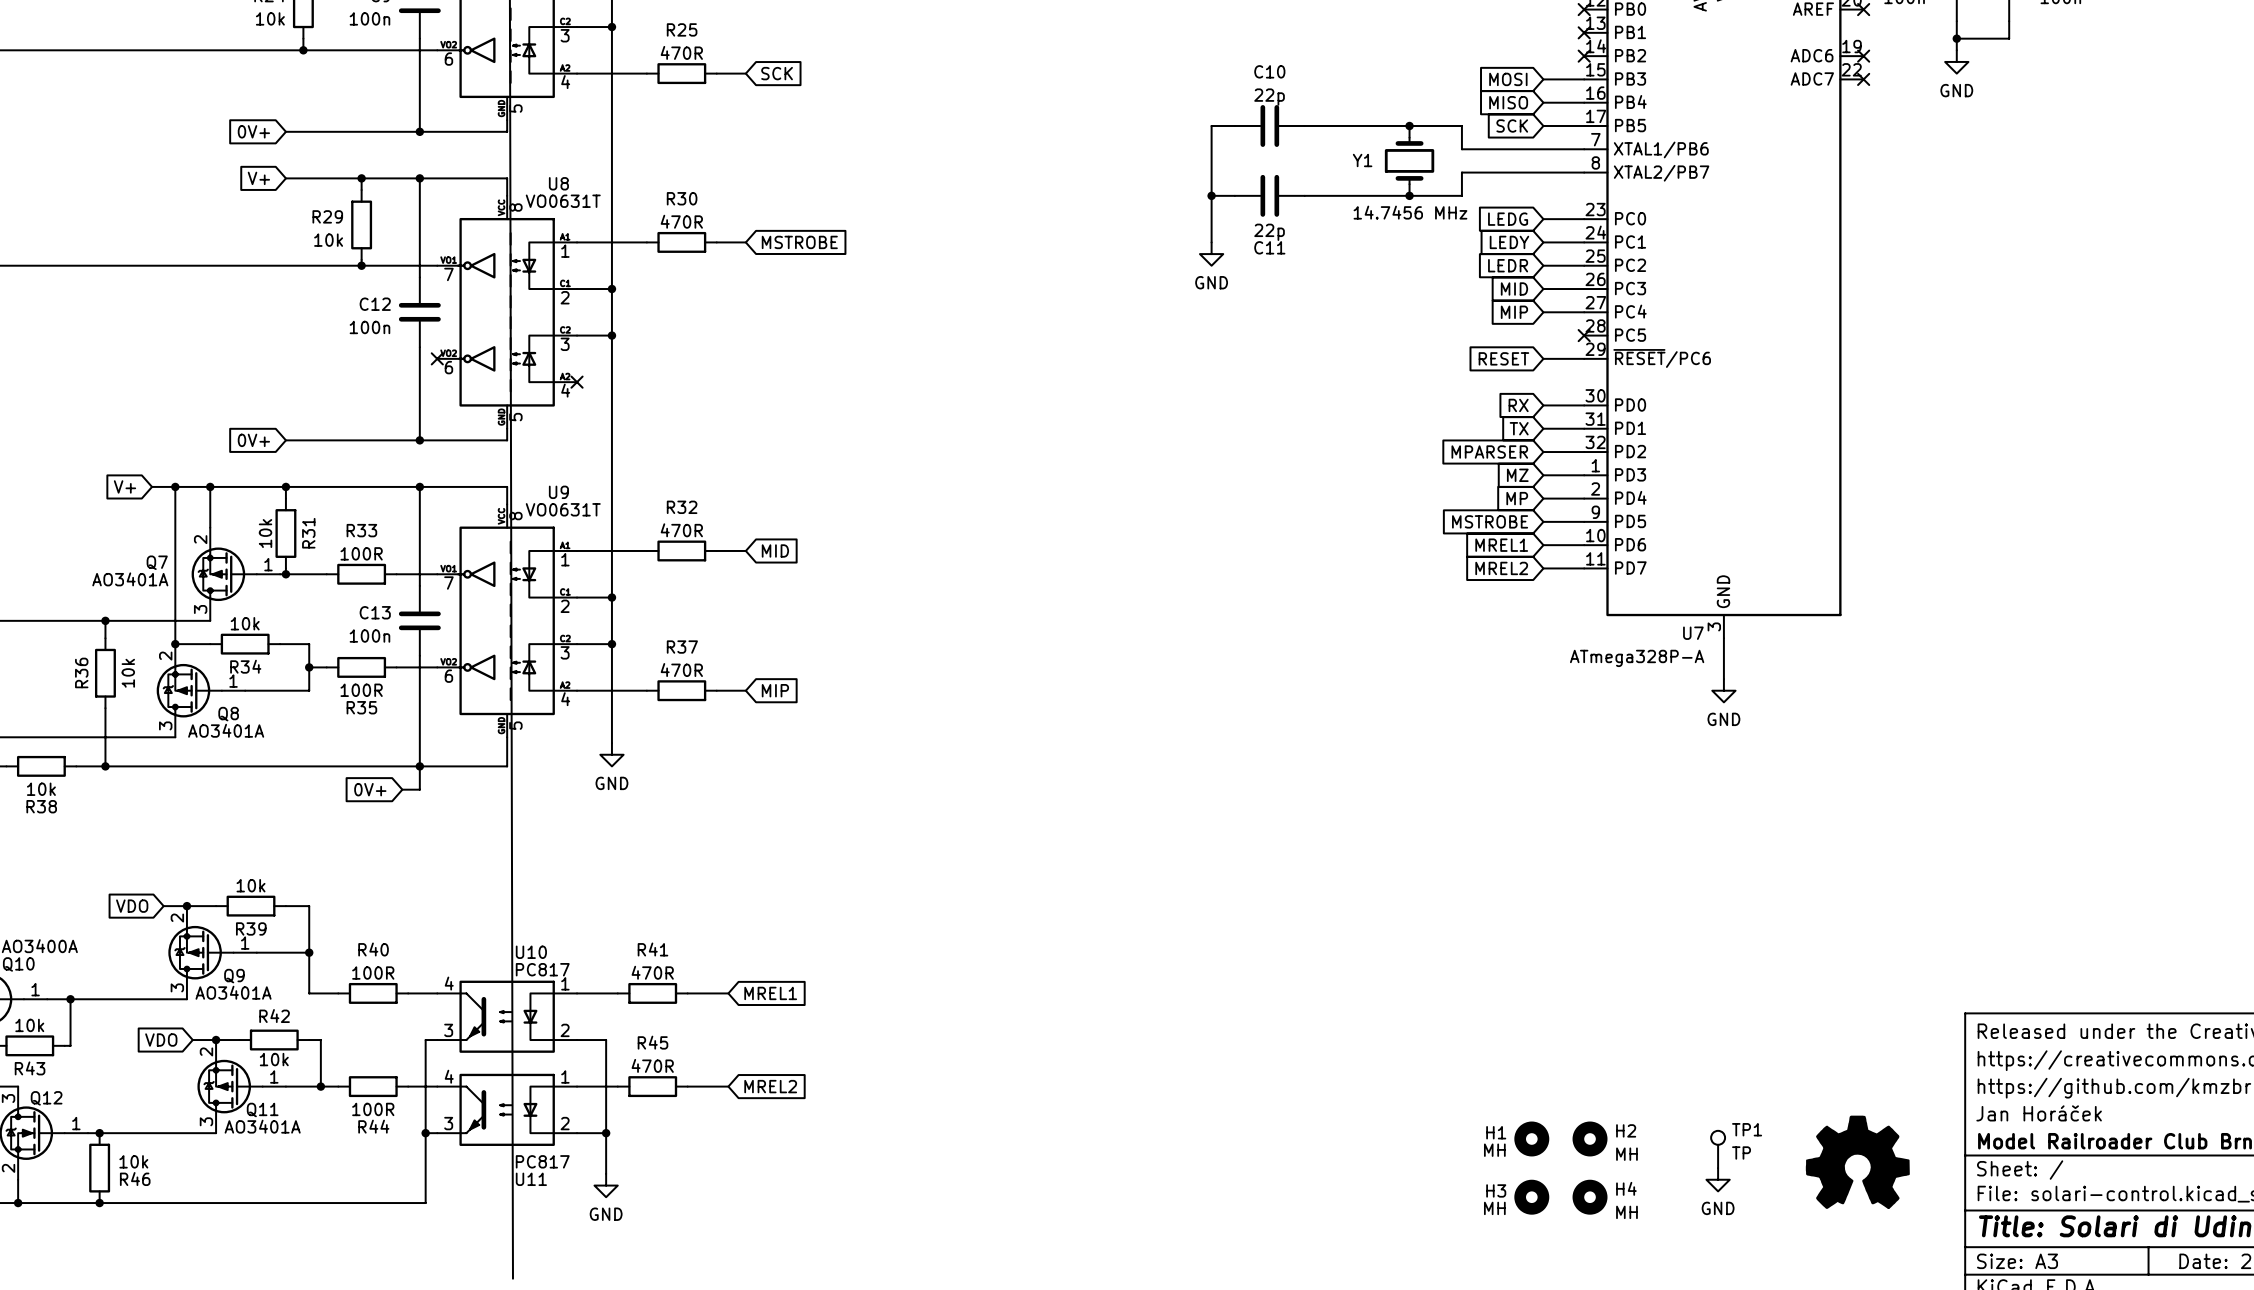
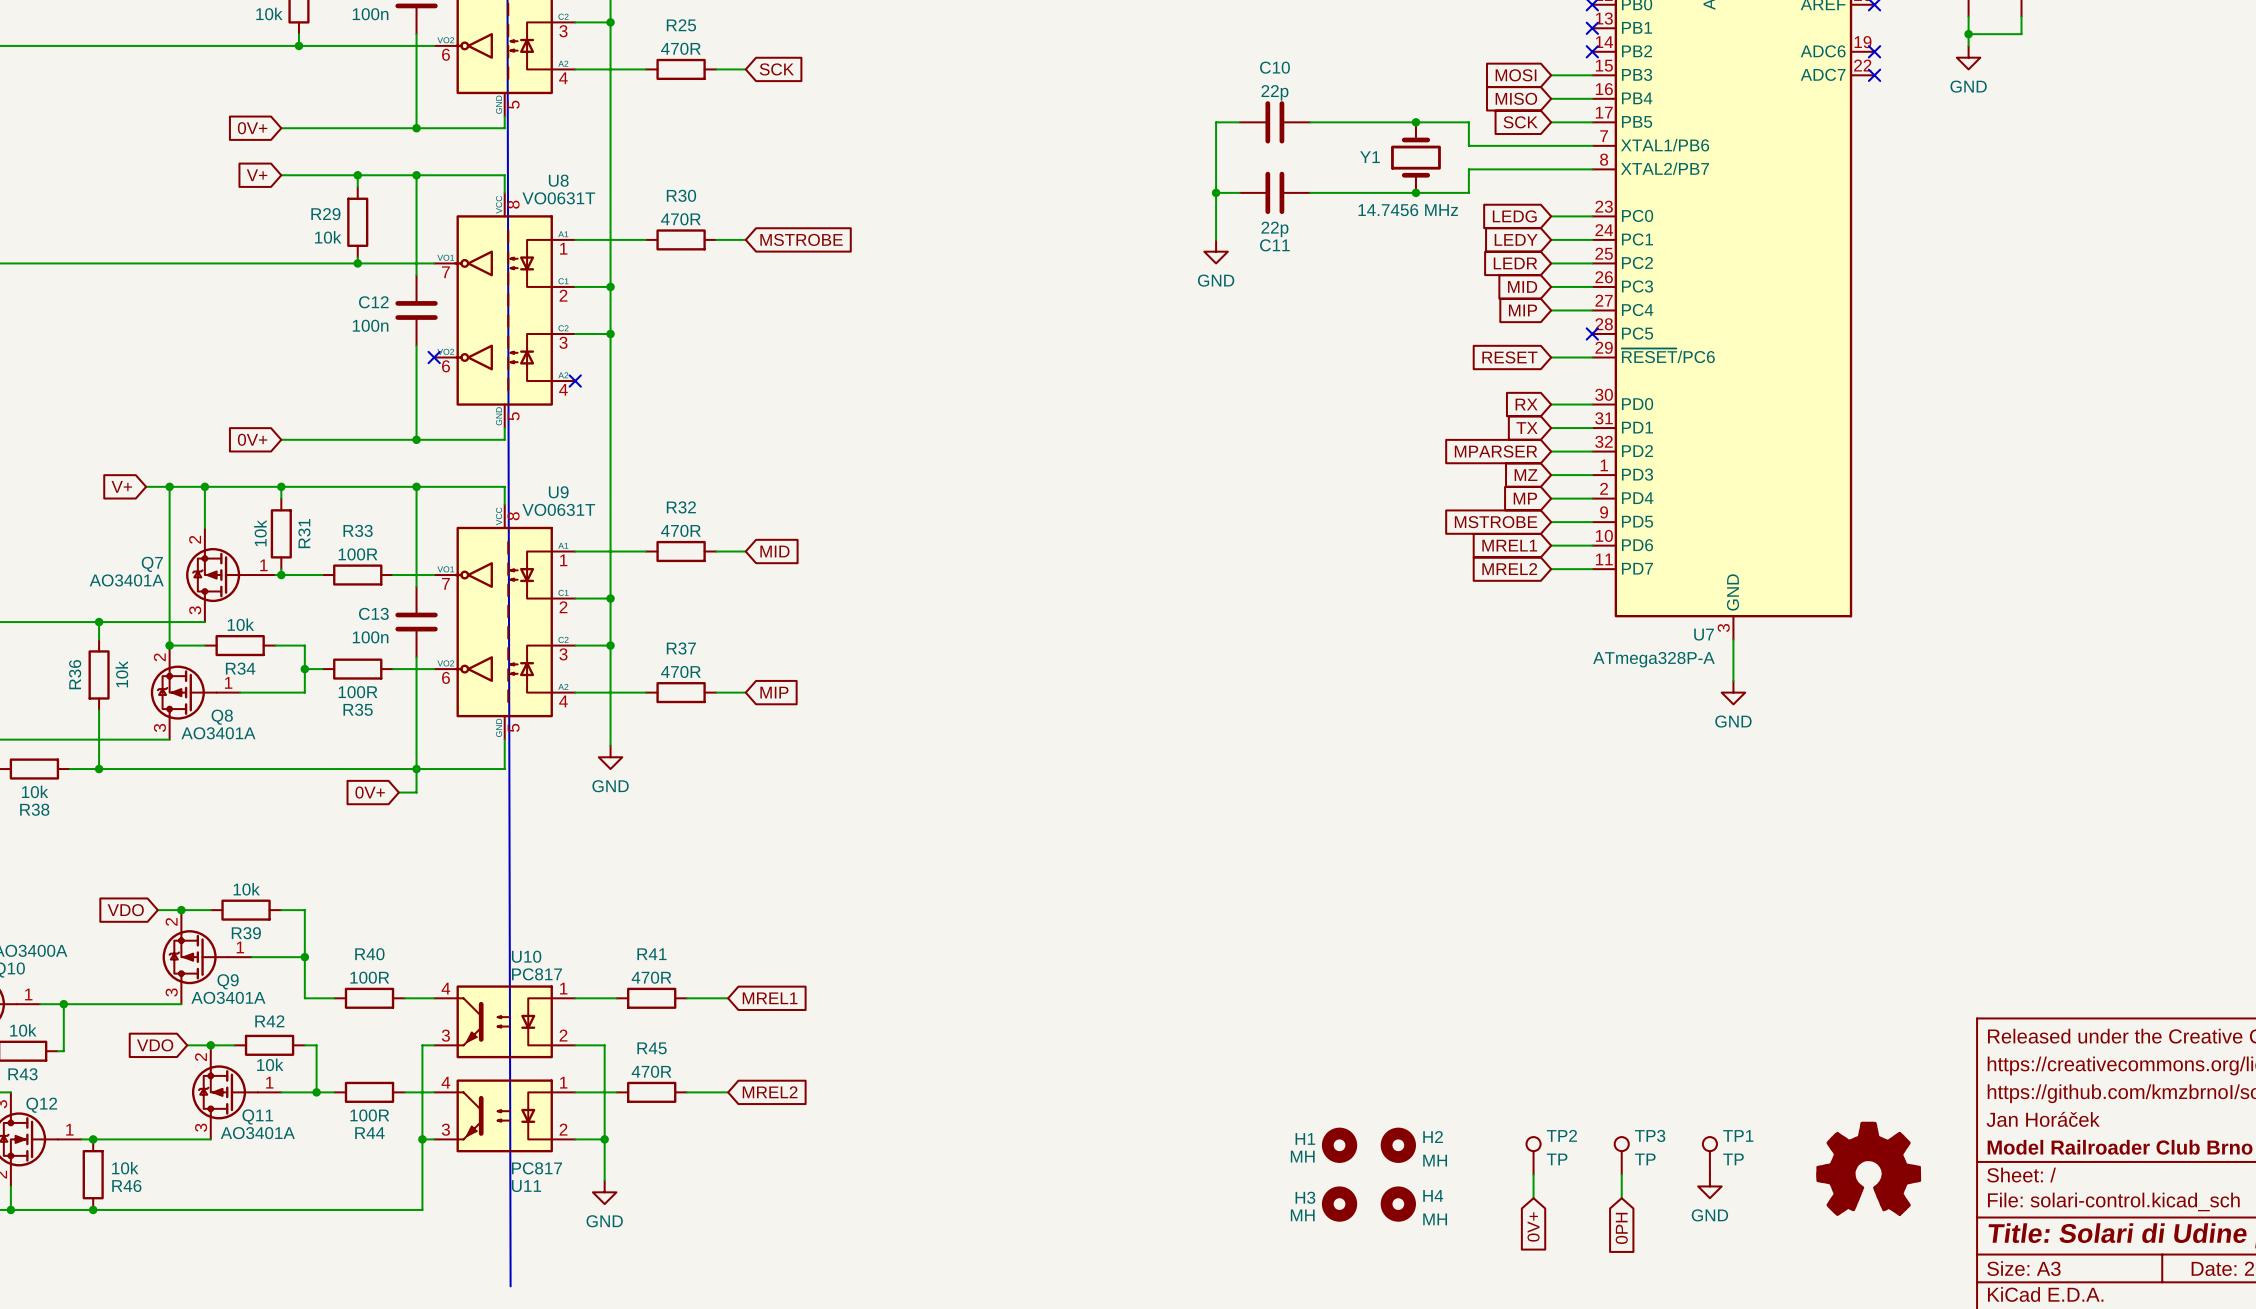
H1 position: (1531, 1138) -> (1339, 1145)
H2 position: (1590, 1138) -> (1398, 1145)
TP2: none -> TP (1533, 1155)
TP3: none -> TP (1621, 1155)
TP1 position: (1718, 1149) -> (1709, 1155)
wire: none -> (1533, 1174) (1533, 1198)
wire: none -> (1621, 1174) (1621, 1198)
power symbol position: GND (1718, 1179) -> GND (1709, 1186)
H3 position: (1531, 1197) -> (1339, 1204)
H4 position: (1590, 1197) -> (1398, 1204)
global label: none -> 0V+ (1533, 1226)
global label: none -> 0PH (1621, 1228)

